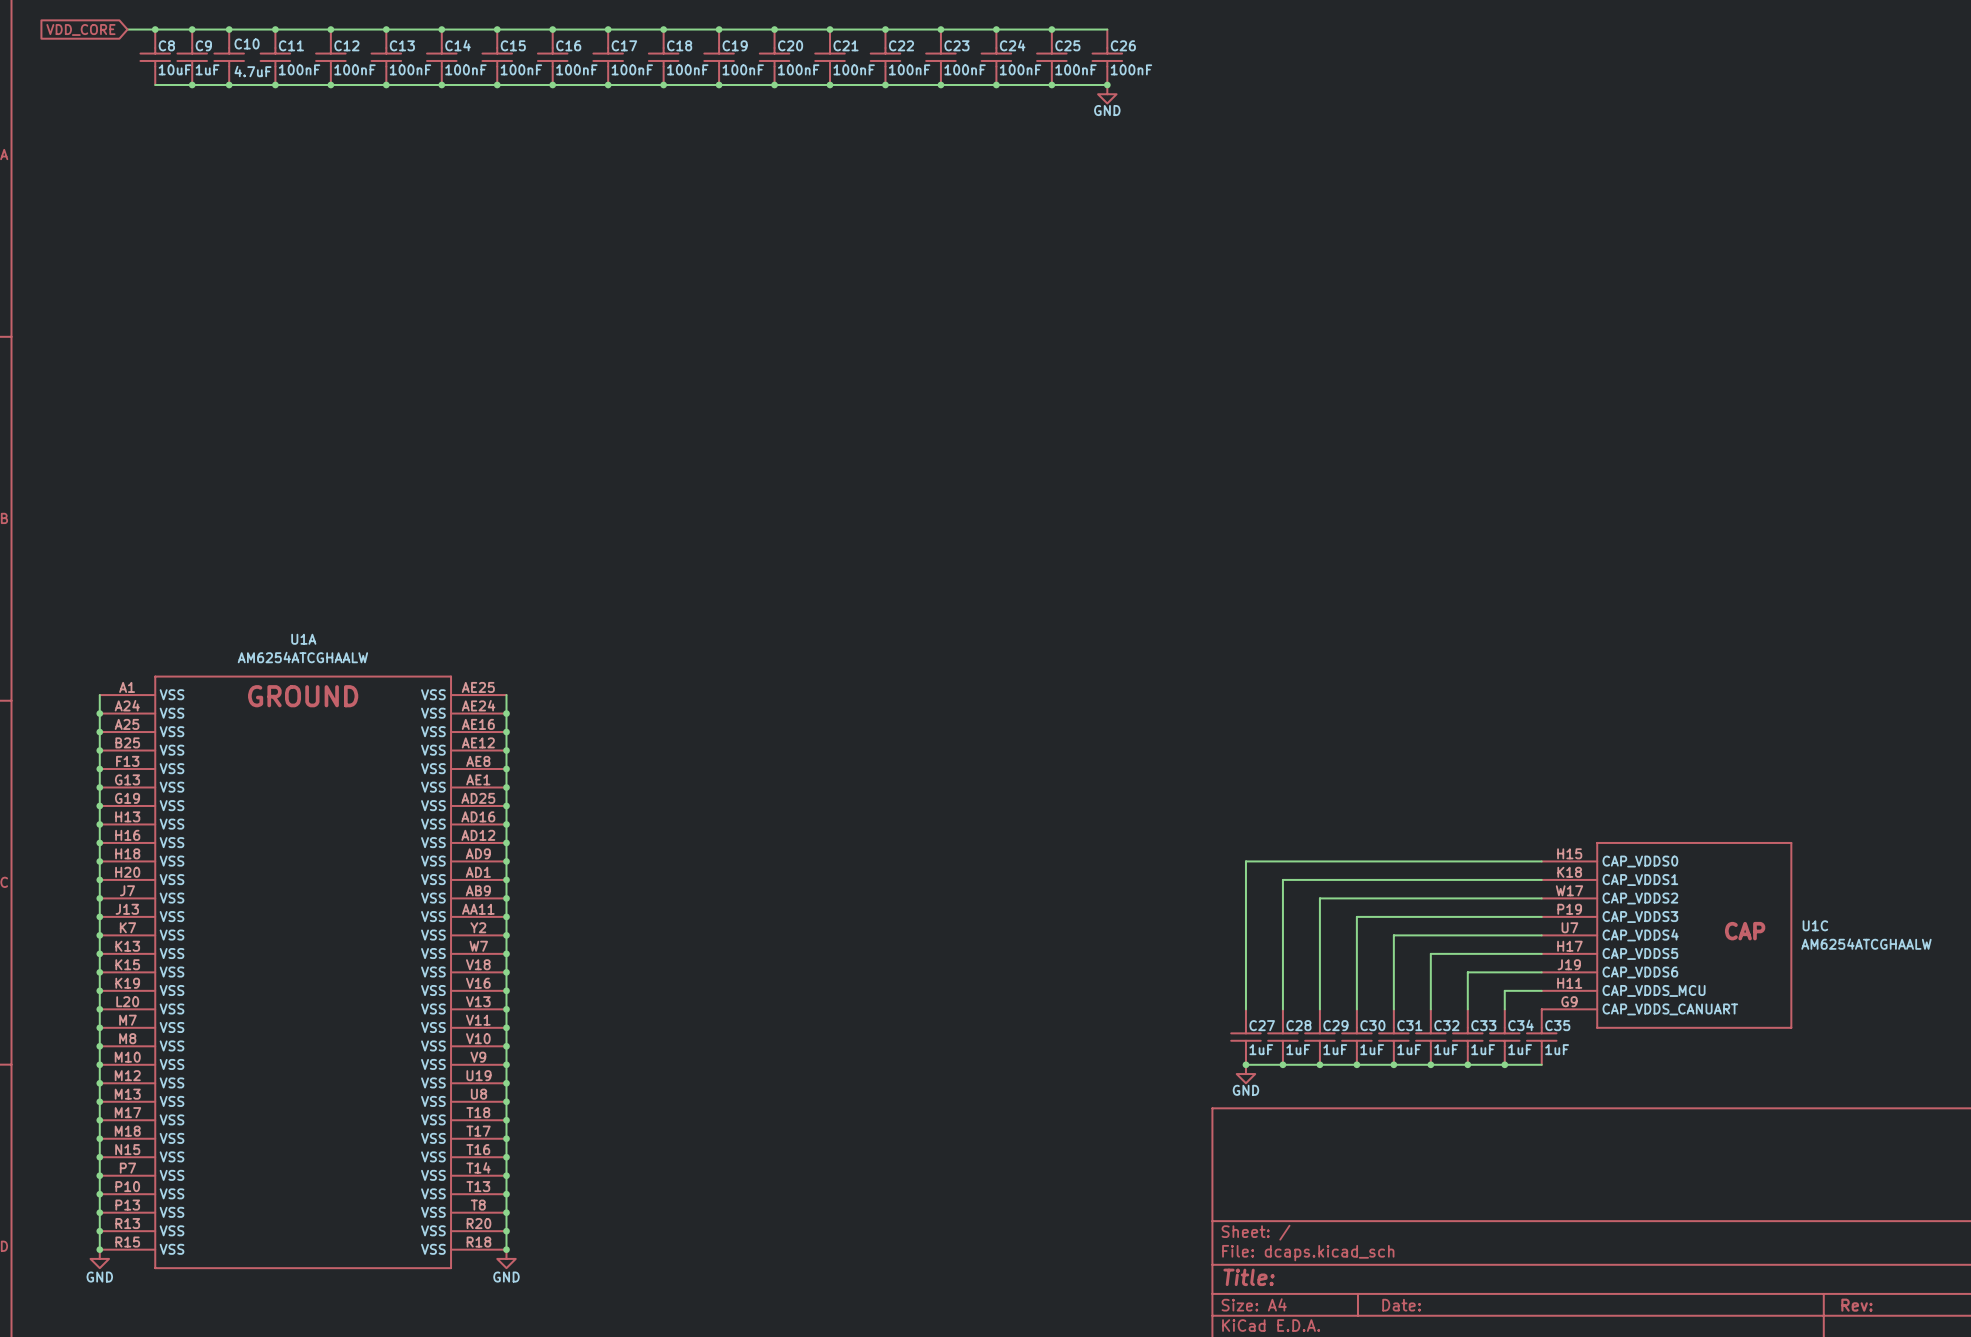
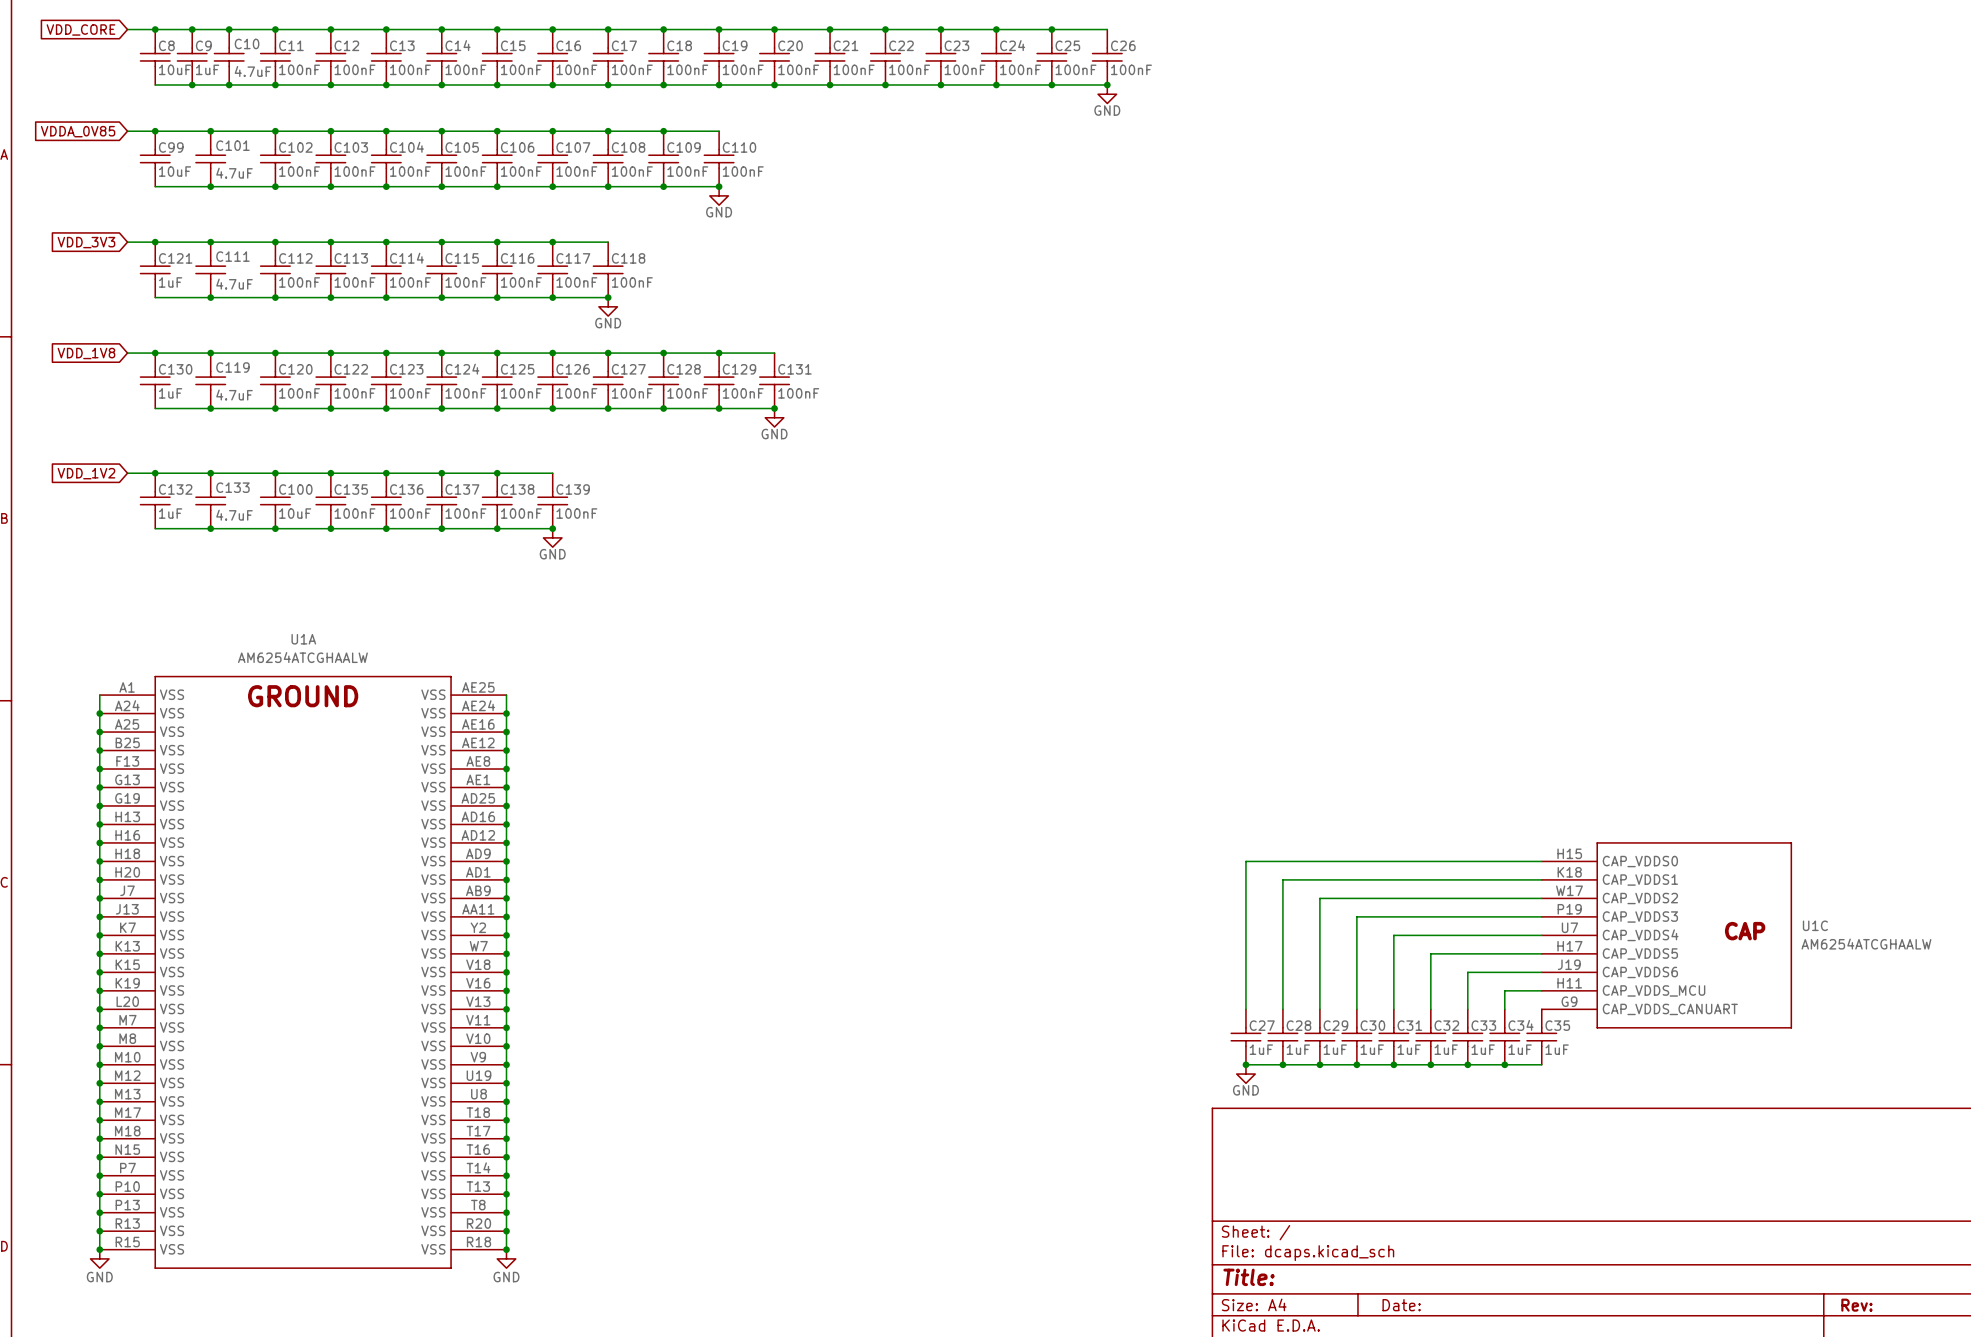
global label: none -> VDDA_0V85 (78, 131)
wire: none -> (127, 131) (719, 131)
junction: none -> (155, 131)
junction: none -> (210, 131)
junction: none -> (275, 131)
junction: none -> (330, 131)
junction: none -> (386, 131)
junction: none -> (441, 131)
junction: none -> (497, 131)
junction: none -> (552, 131)
junction: none -> (608, 131)
junction: none -> (663, 131)
C99: none -> (155, 158)
C101: none -> (210, 158)
C102: none -> (275, 158)
C103: none -> (330, 158)
C104: none -> (386, 158)
C105: none -> (441, 158)
C106: none -> (497, 158)
C107: none -> (552, 158)
C108: none -> (608, 158)
C109: none -> (663, 158)
C110: none -> (719, 158)
wire: none -> (155, 186) (719, 186)
junction: none -> (210, 186)
junction: none -> (275, 186)
junction: none -> (330, 186)
junction: none -> (386, 186)
junction: none -> (441, 186)
junction: none -> (497, 186)
junction: none -> (552, 186)
junction: none -> (608, 186)
junction: none -> (663, 186)
junction: none -> (719, 186)
power symbol: none -> GND (719, 195)
global label: none -> VDD_3V3 (86, 242)
wire: none -> (127, 242) (608, 242)
junction: none -> (155, 242)
junction: none -> (210, 242)
junction: none -> (275, 242)
junction: none -> (330, 242)
junction: none -> (386, 242)
junction: none -> (441, 242)
junction: none -> (497, 242)
junction: none -> (552, 242)
C121: none -> (155, 269)
C111: none -> (210, 269)
C112: none -> (275, 269)
C113: none -> (330, 269)
C114: none -> (386, 269)
C115: none -> (441, 269)
C116: none -> (497, 269)
C117: none -> (552, 269)
C118: none -> (608, 269)
wire: none -> (155, 297) (608, 297)
junction: none -> (210, 297)
junction: none -> (275, 297)
junction: none -> (330, 297)
junction: none -> (386, 297)
junction: none -> (441, 297)
junction: none -> (497, 297)
junction: none -> (552, 297)
junction: none -> (608, 297)
power symbol: none -> GND (608, 306)
global label: none -> VDD_1V8 (86, 353)
wire: none -> (127, 353) (774, 353)
junction: none -> (155, 353)
junction: none -> (210, 353)
junction: none -> (275, 353)
junction: none -> (330, 353)
junction: none -> (386, 353)
junction: none -> (441, 353)
junction: none -> (497, 353)
junction: none -> (552, 353)
junction: none -> (608, 353)
junction: none -> (663, 353)
junction: none -> (719, 353)
C130: none -> (155, 380)
C119: none -> (210, 380)
C120: none -> (275, 380)
C122: none -> (330, 380)
C123: none -> (386, 380)
C124: none -> (441, 380)
C125: none -> (497, 380)
C126: none -> (552, 380)
C127: none -> (608, 380)
C128: none -> (663, 380)
C129: none -> (719, 380)
C131: none -> (774, 380)
wire: none -> (155, 408) (774, 408)
junction: none -> (210, 408)
junction: none -> (275, 408)
junction: none -> (330, 408)
junction: none -> (386, 408)
junction: none -> (441, 408)
junction: none -> (497, 408)
junction: none -> (552, 408)
junction: none -> (608, 408)
junction: none -> (663, 408)
junction: none -> (719, 408)
junction: none -> (774, 408)
power symbol: none -> GND (774, 417)
global label: none -> VDD_1V2 (86, 473)
wire: none -> (127, 473) (552, 473)
junction: none -> (155, 473)
junction: none -> (210, 473)
junction: none -> (275, 473)
junction: none -> (330, 473)
junction: none -> (386, 473)
junction: none -> (441, 473)
junction: none -> (497, 473)
C132: none -> (155, 500)
C133: none -> (210, 500)
C100: none -> (275, 500)
C135: none -> (330, 500)
C136: none -> (386, 500)
C137: none -> (441, 500)
C138: none -> (497, 500)
C139: none -> (552, 500)
wire: none -> (155, 528) (552, 528)
junction: none -> (210, 528)
junction: none -> (275, 528)
junction: none -> (330, 528)
junction: none -> (386, 528)
junction: none -> (441, 528)
junction: none -> (497, 528)
junction: none -> (552, 528)
power symbol: none -> GND (552, 537)

